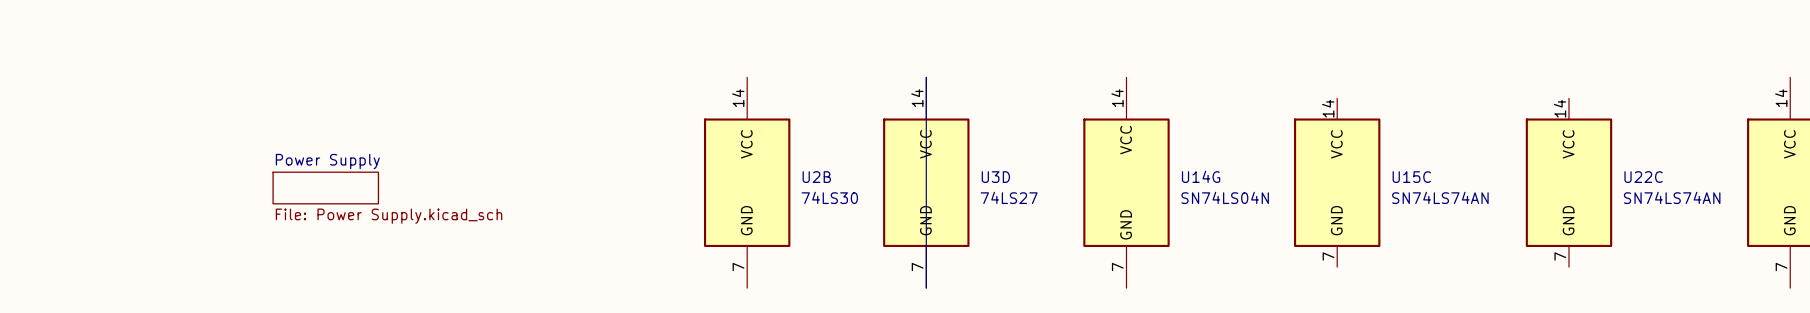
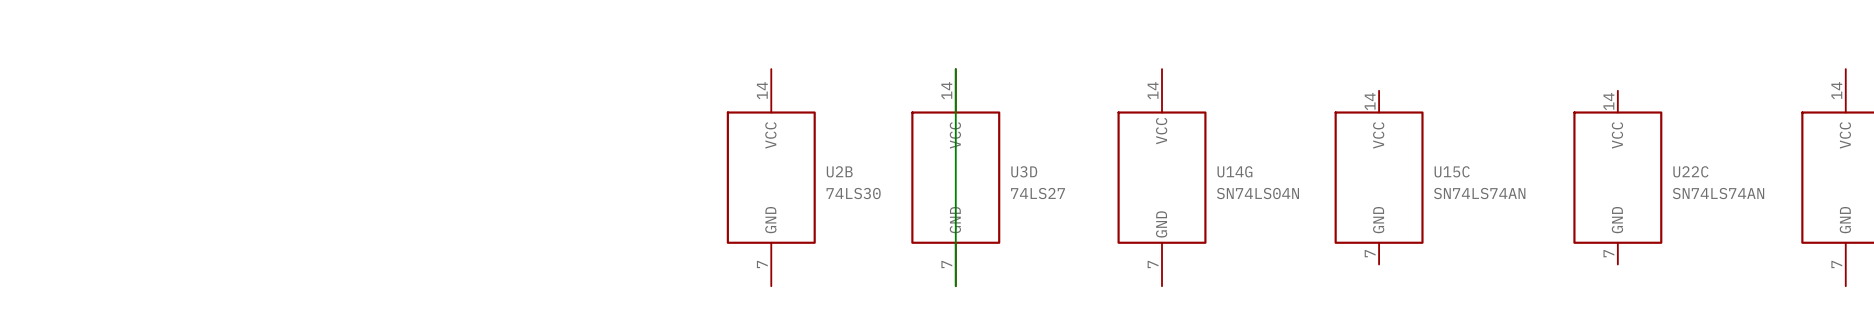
sheet Power Supply: File: Power Supply.kicad_sch (325, 188) -> none

